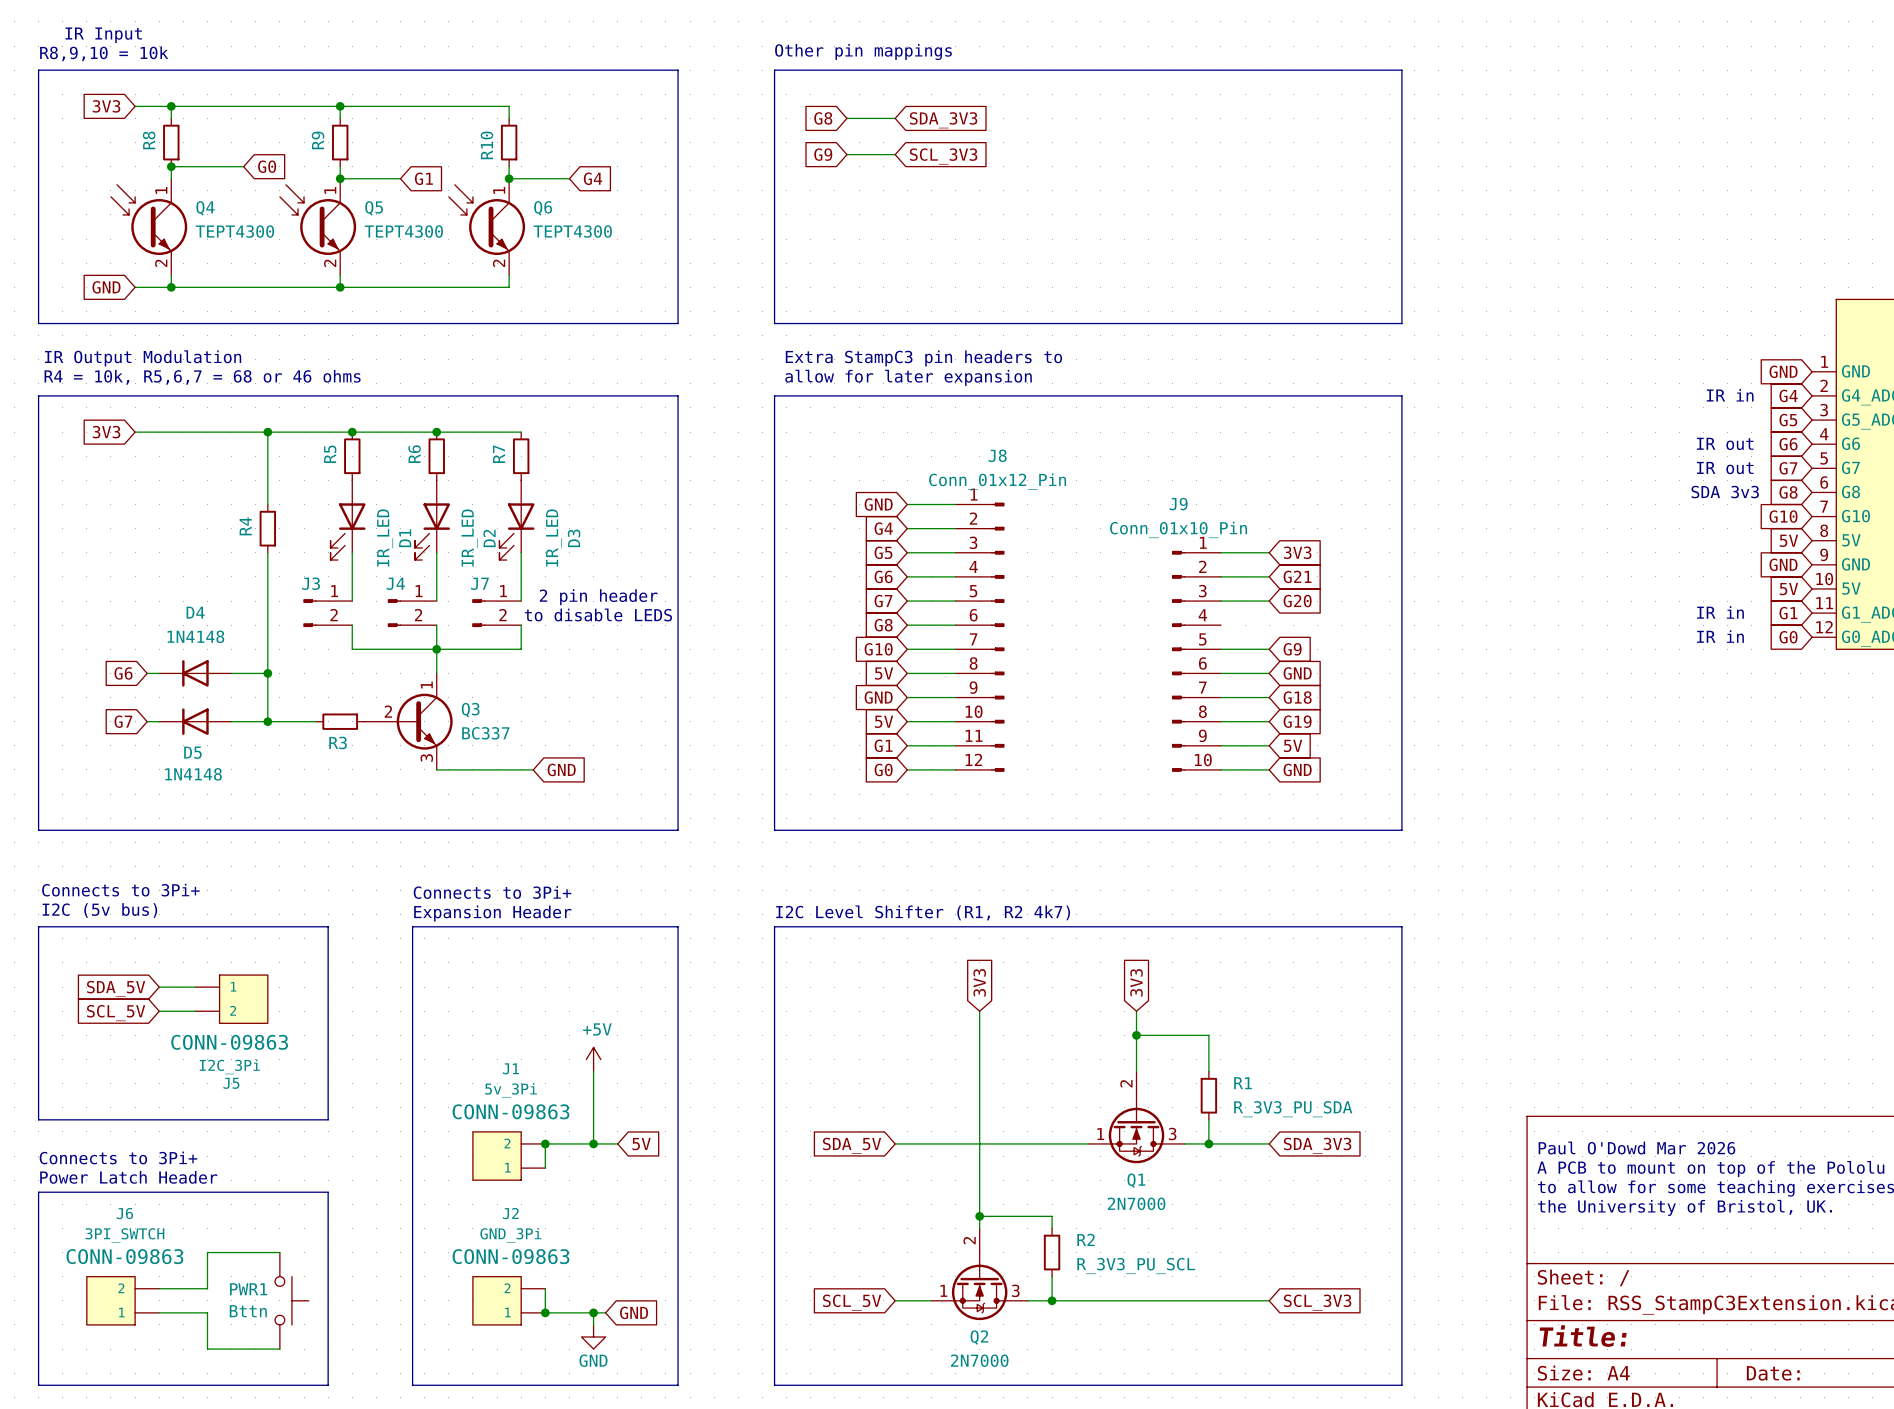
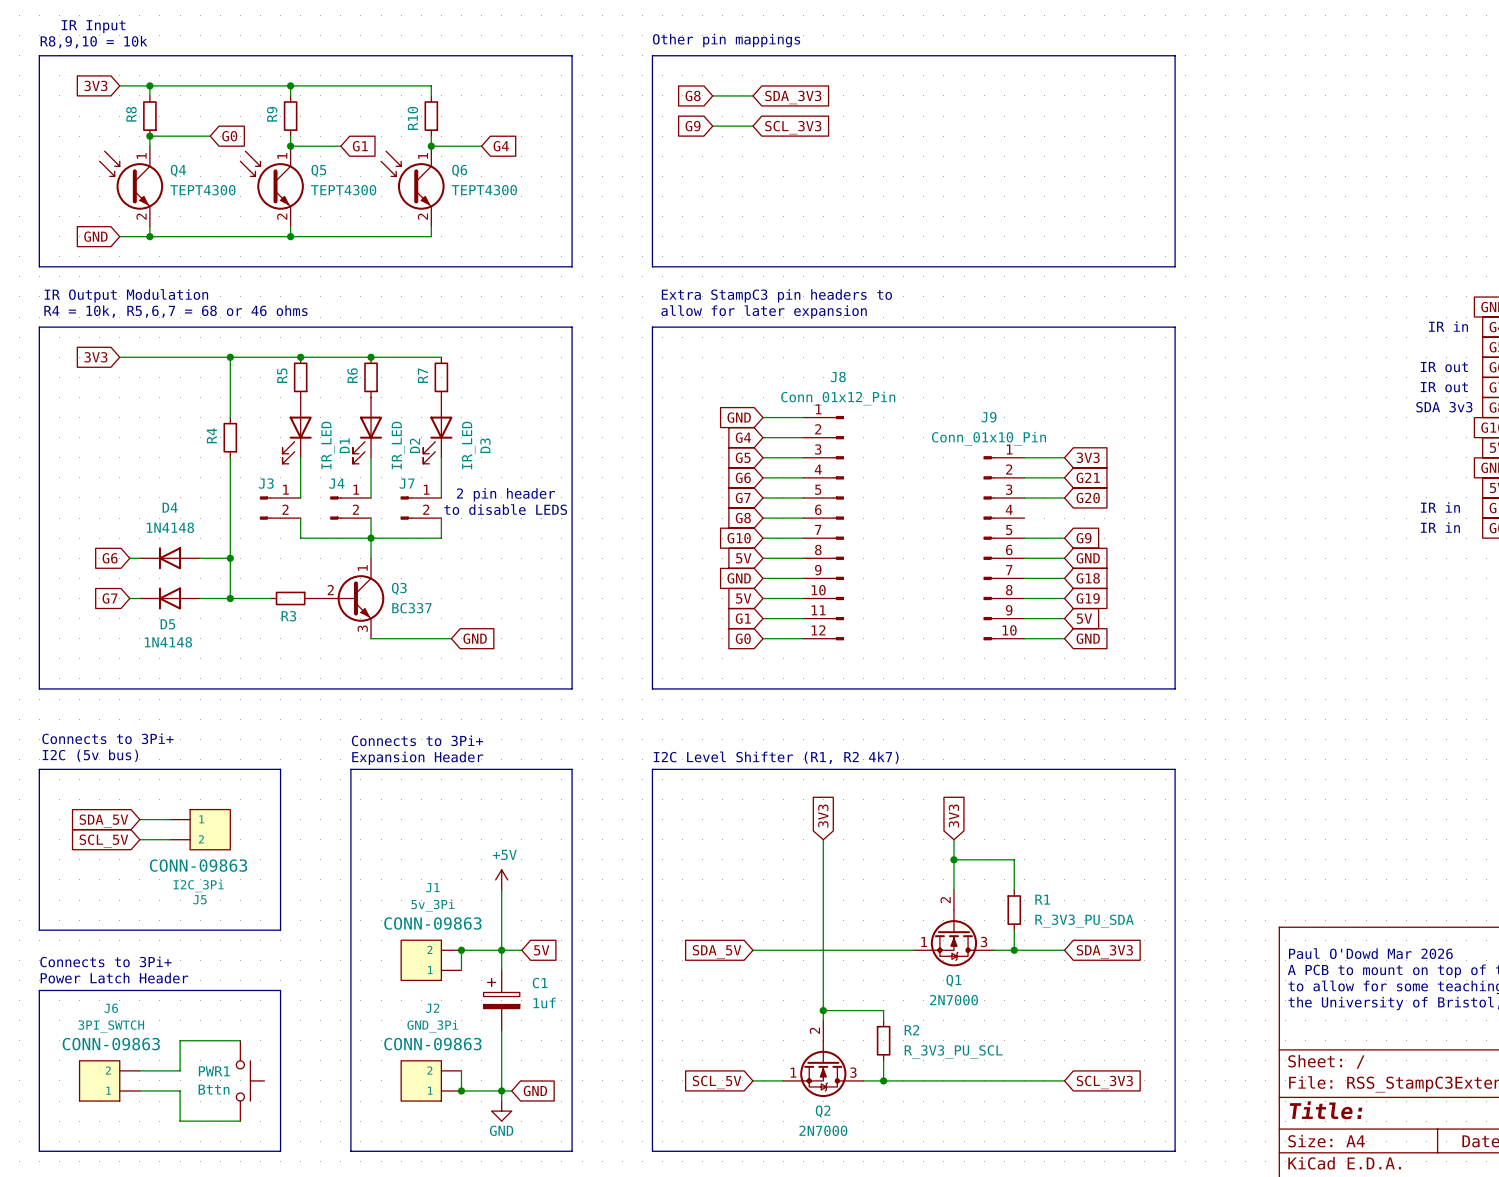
wire: none -> (501, 950) (501, 970)
C1: none -> 1uf (501, 1000)
wire: none -> (501, 1030) (501, 1090)

